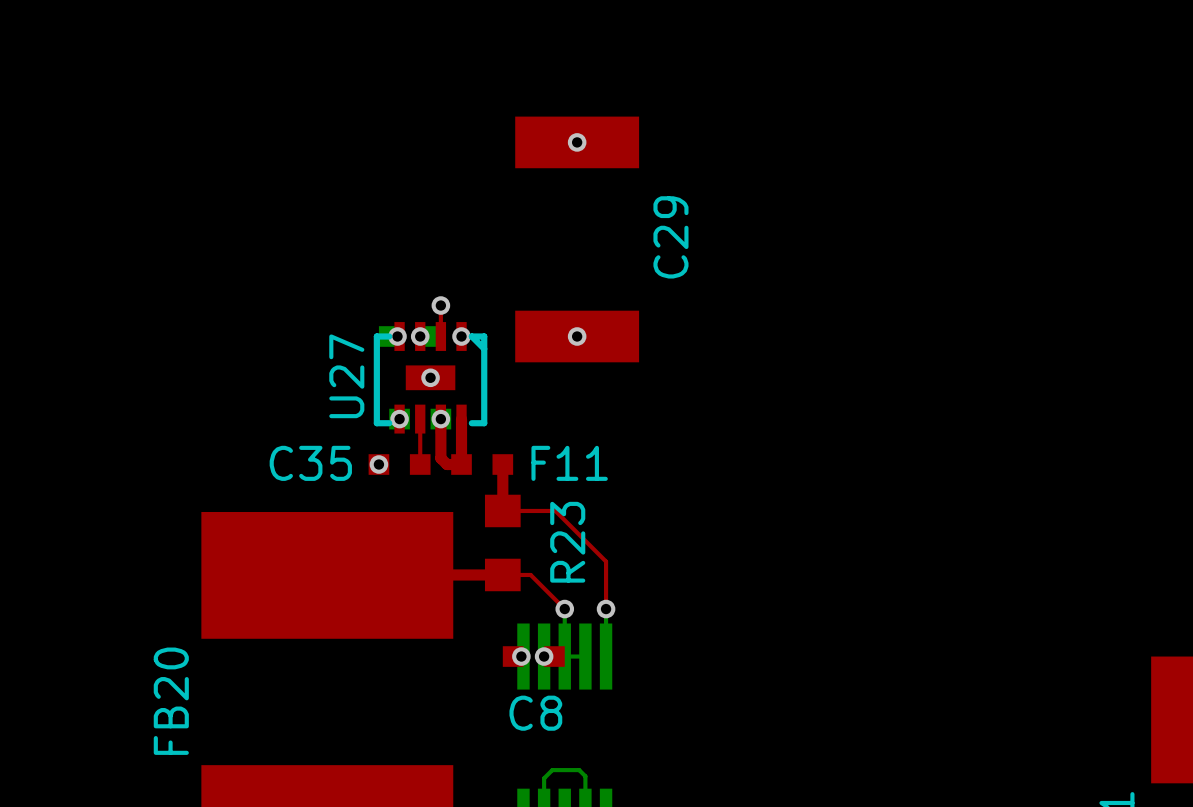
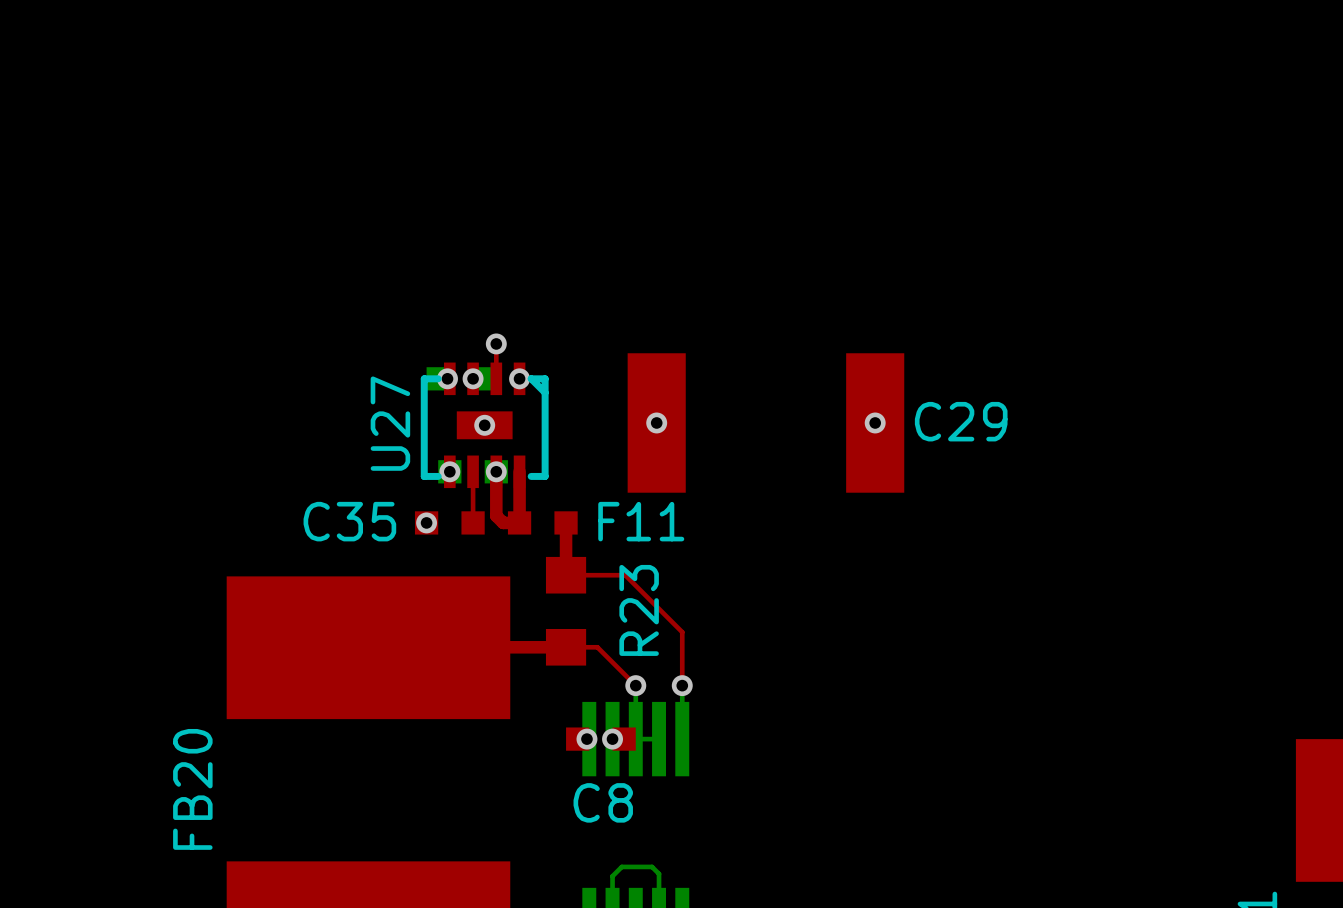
via: (577, 142) -> none
C29 rotation: 0° (577, 239) -> 90° clockwise (765, 422)
C29 position: (577, 239) -> (765, 422)
via position: (577, 336) -> (656, 422)
via: none -> (875, 422)

